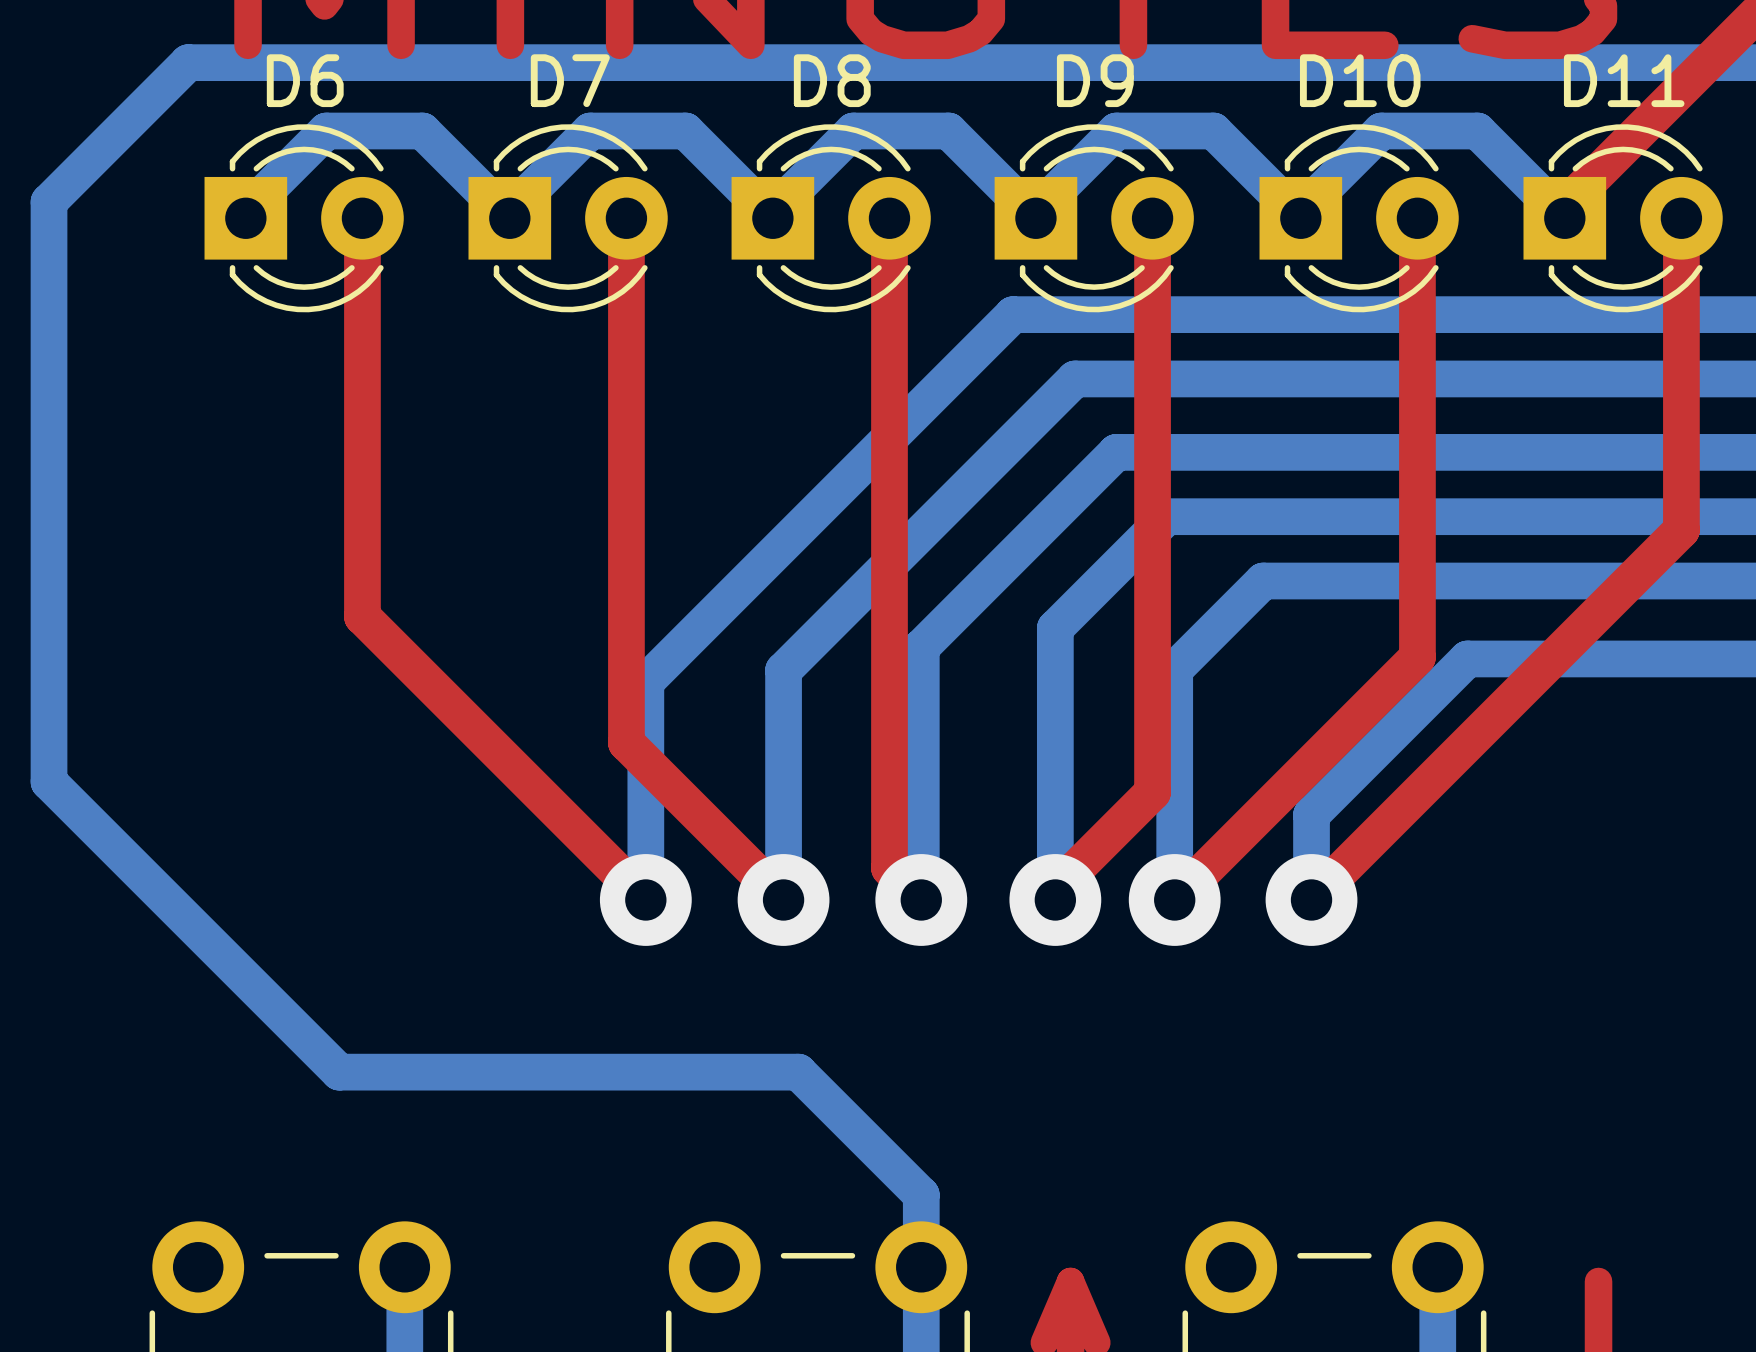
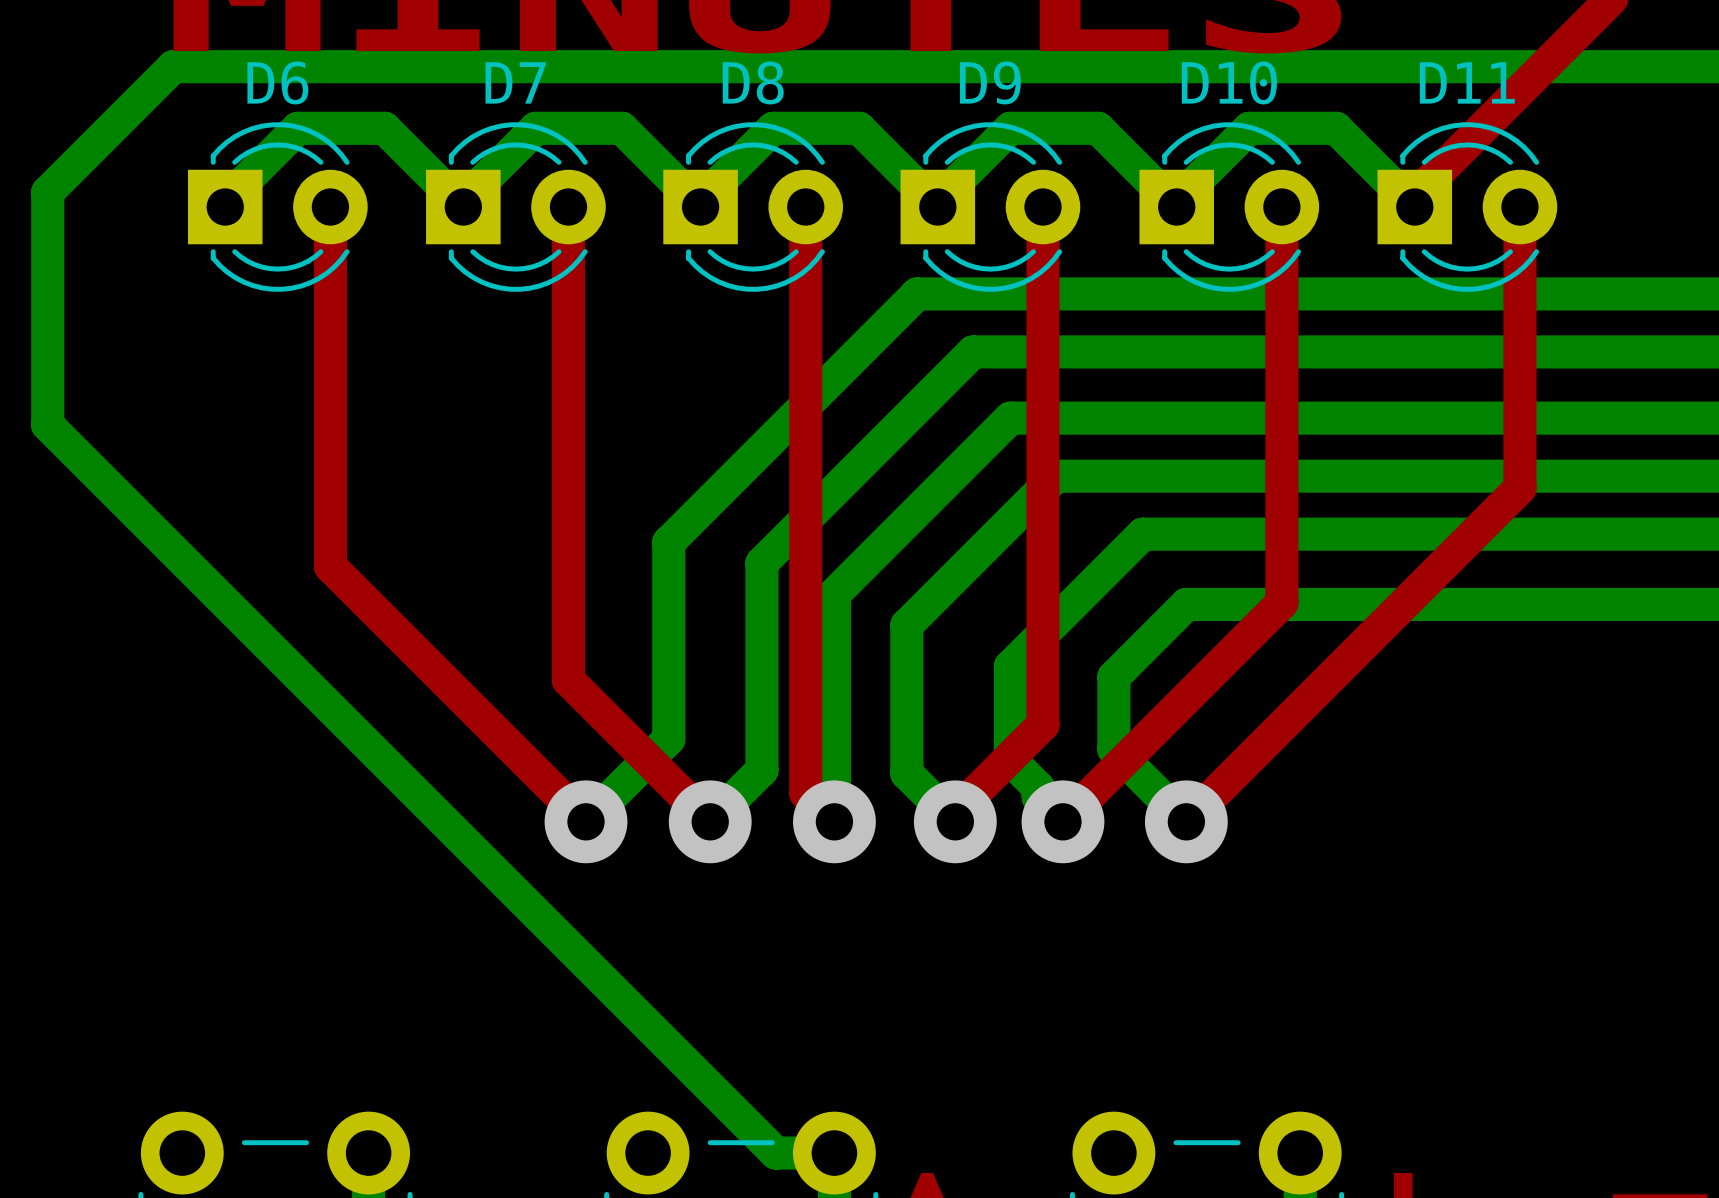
bottom track: (48, 459) (49, 781) (339, 1072) (798, 1072) (921, 1195) (921, 1267) -> (47, 424) (775, 1153) (834, 1153)
bottom track: (1263, 581) (1174, 669) (1174, 899) -> (1142, 534) (1010, 666) (1010, 759) (1038, 787) (1038, 797) (1062, 821)
bottom track: (737, 590) (645, 681) (645, 899) -> (668, 542) (668, 739) (585, 821)
bottom track: (840, 613) (783, 670) (783, 899) -> (761, 563) (761, 770) (710, 821)
bottom track: (1055, 628) (1055, 899) -> (955, 576) (906, 625) (906, 773) (955, 821)
bottom track: (1467, 658) (1311, 814) (1311, 899) -> (1327, 604) (1186, 604) (1113, 676) (1113, 749) (1186, 821)

